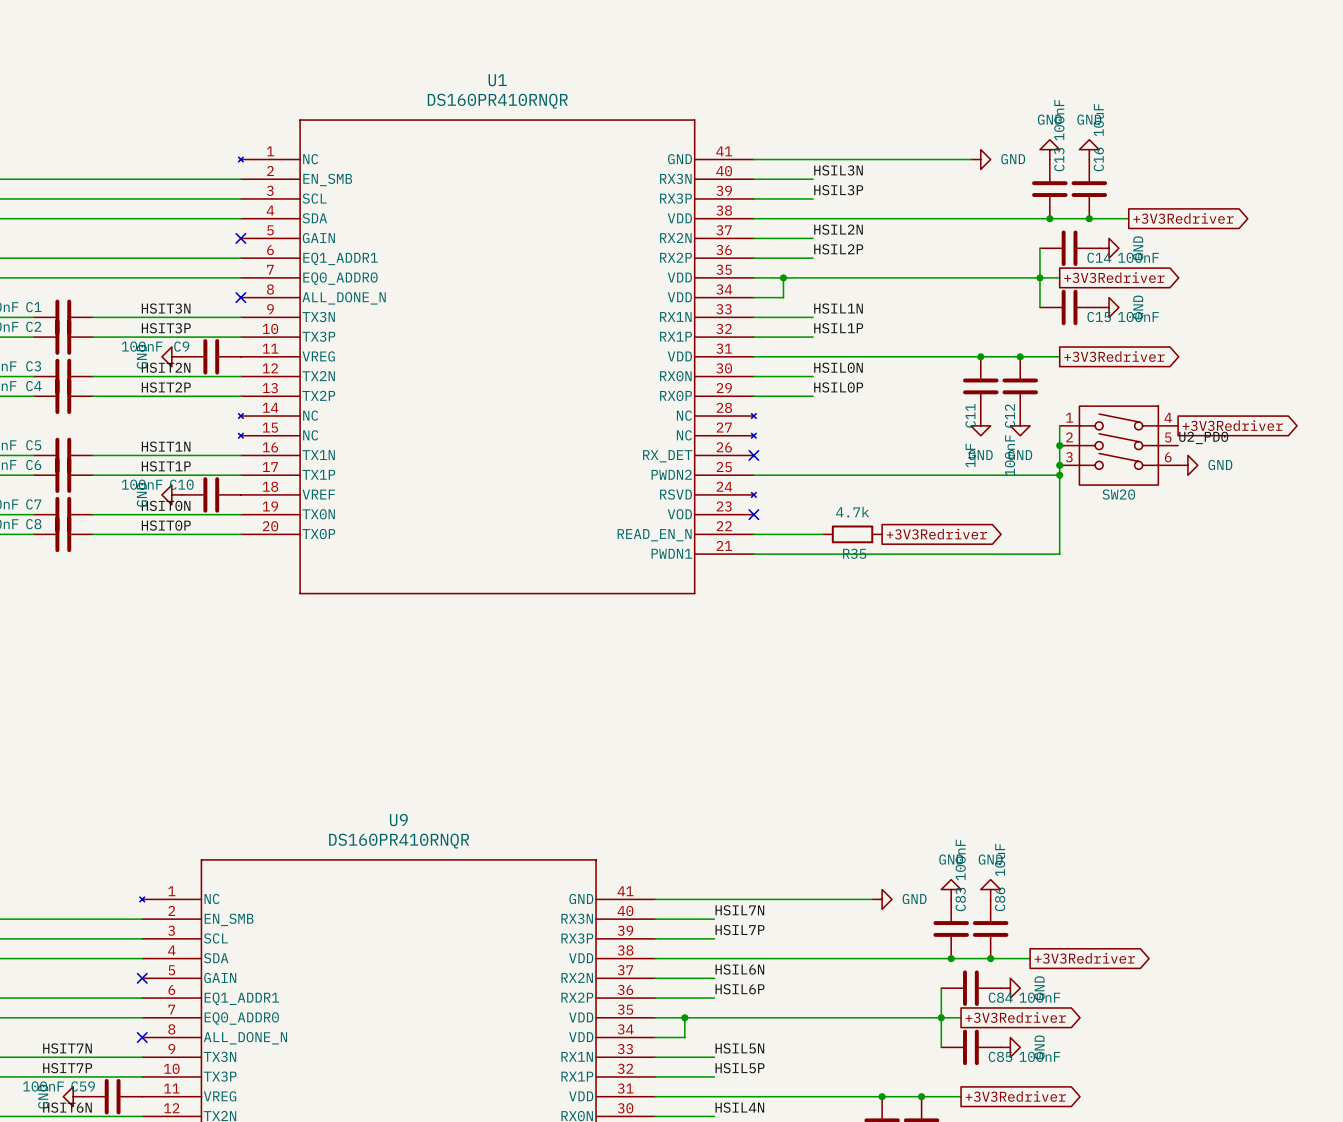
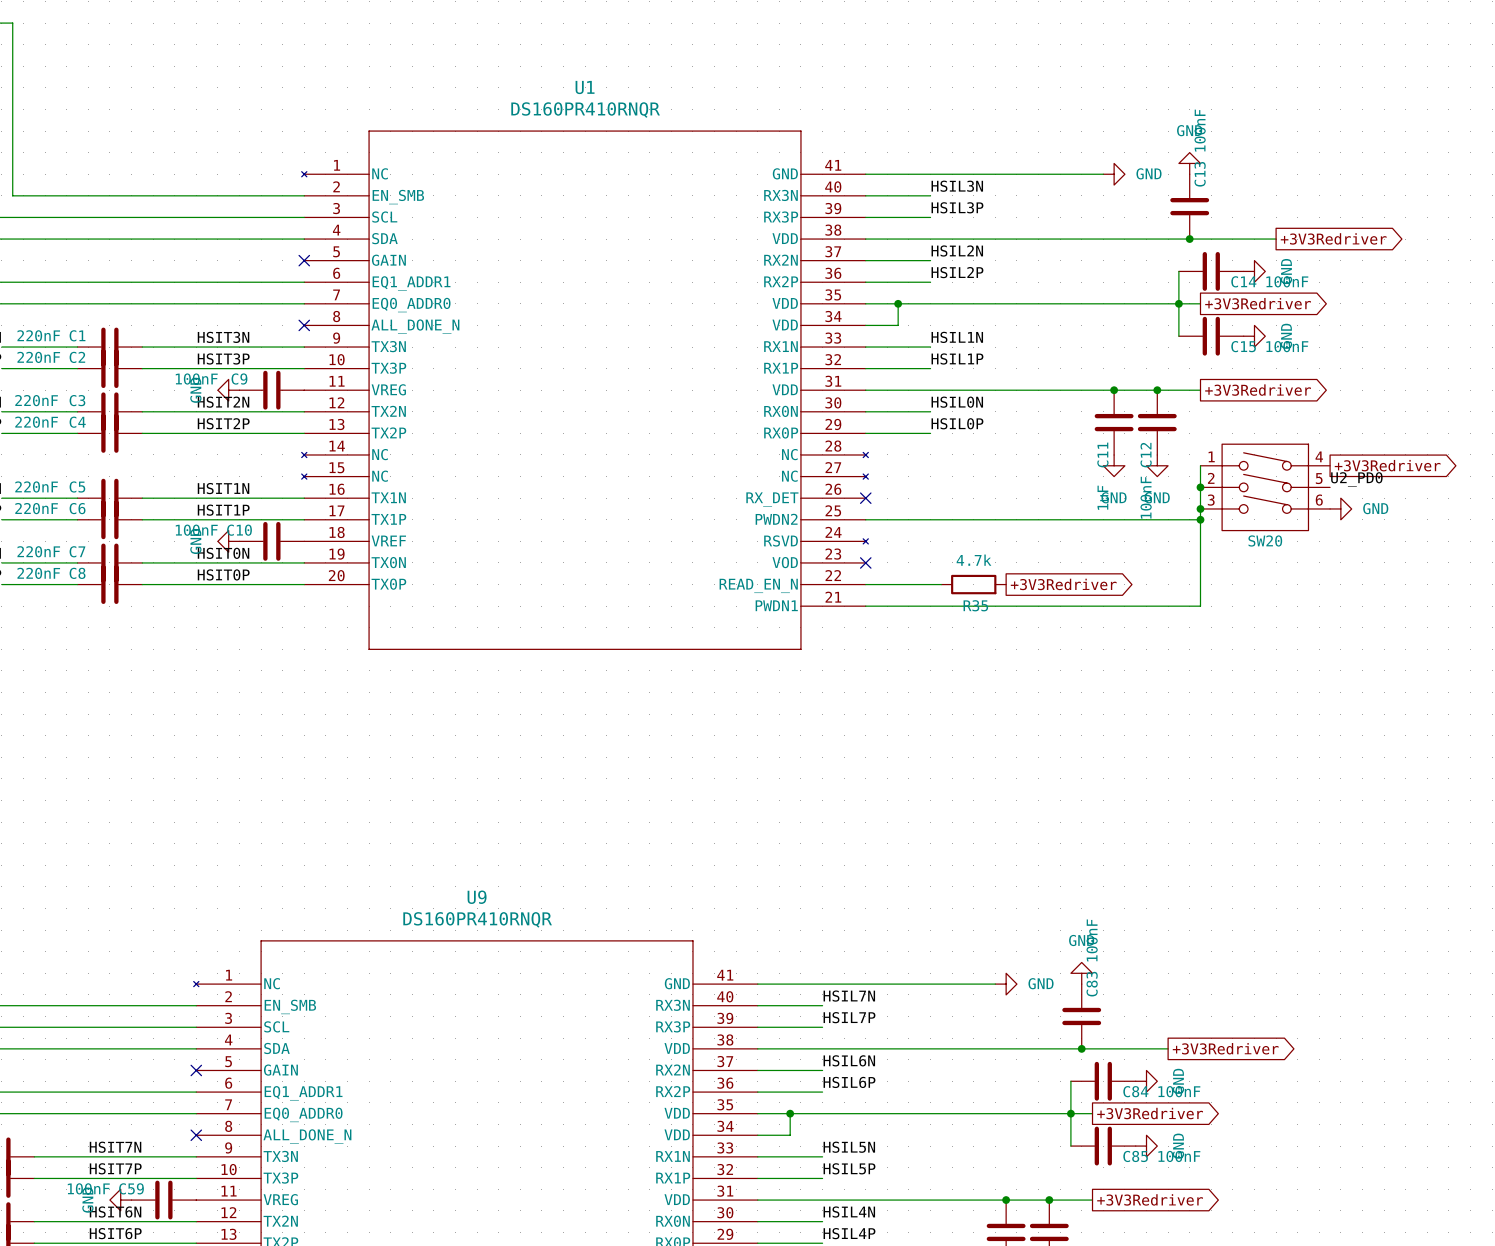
power symbol: GND (1089, 149) -> none
C16: 10uF (1089, 189) -> none
junction: (1089, 218) -> none
power symbol: GND (990, 889) -> none
C86: 10uF (990, 928) -> none
junction: (990, 958) -> none

